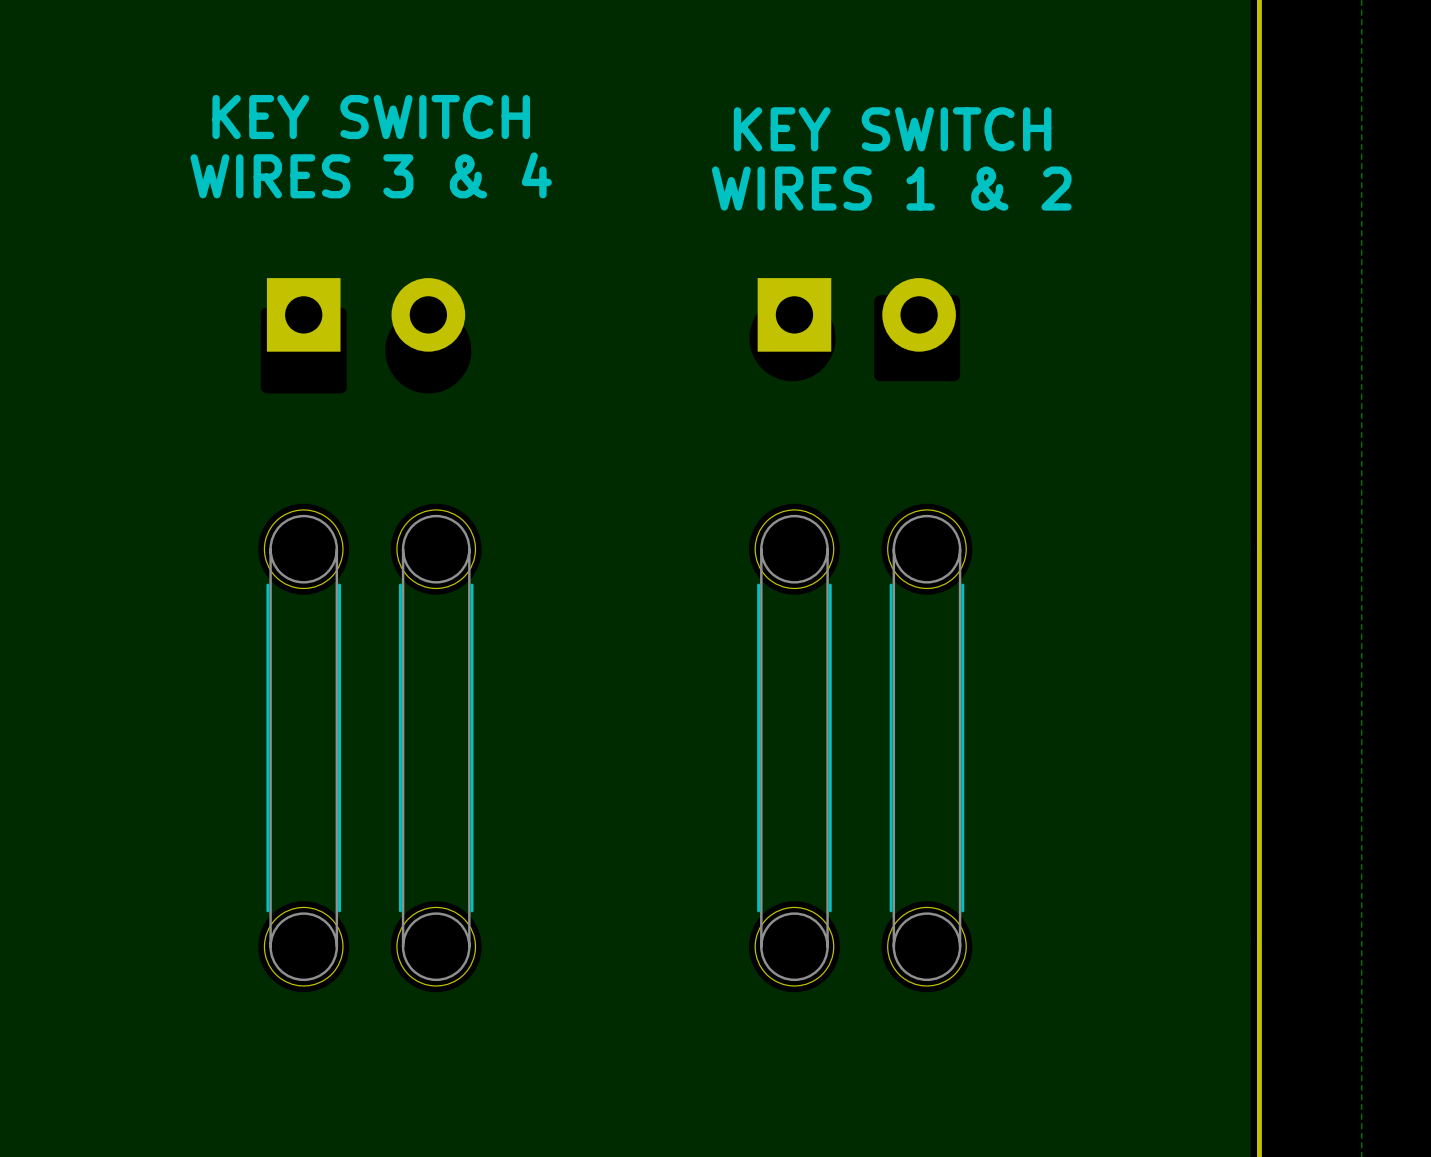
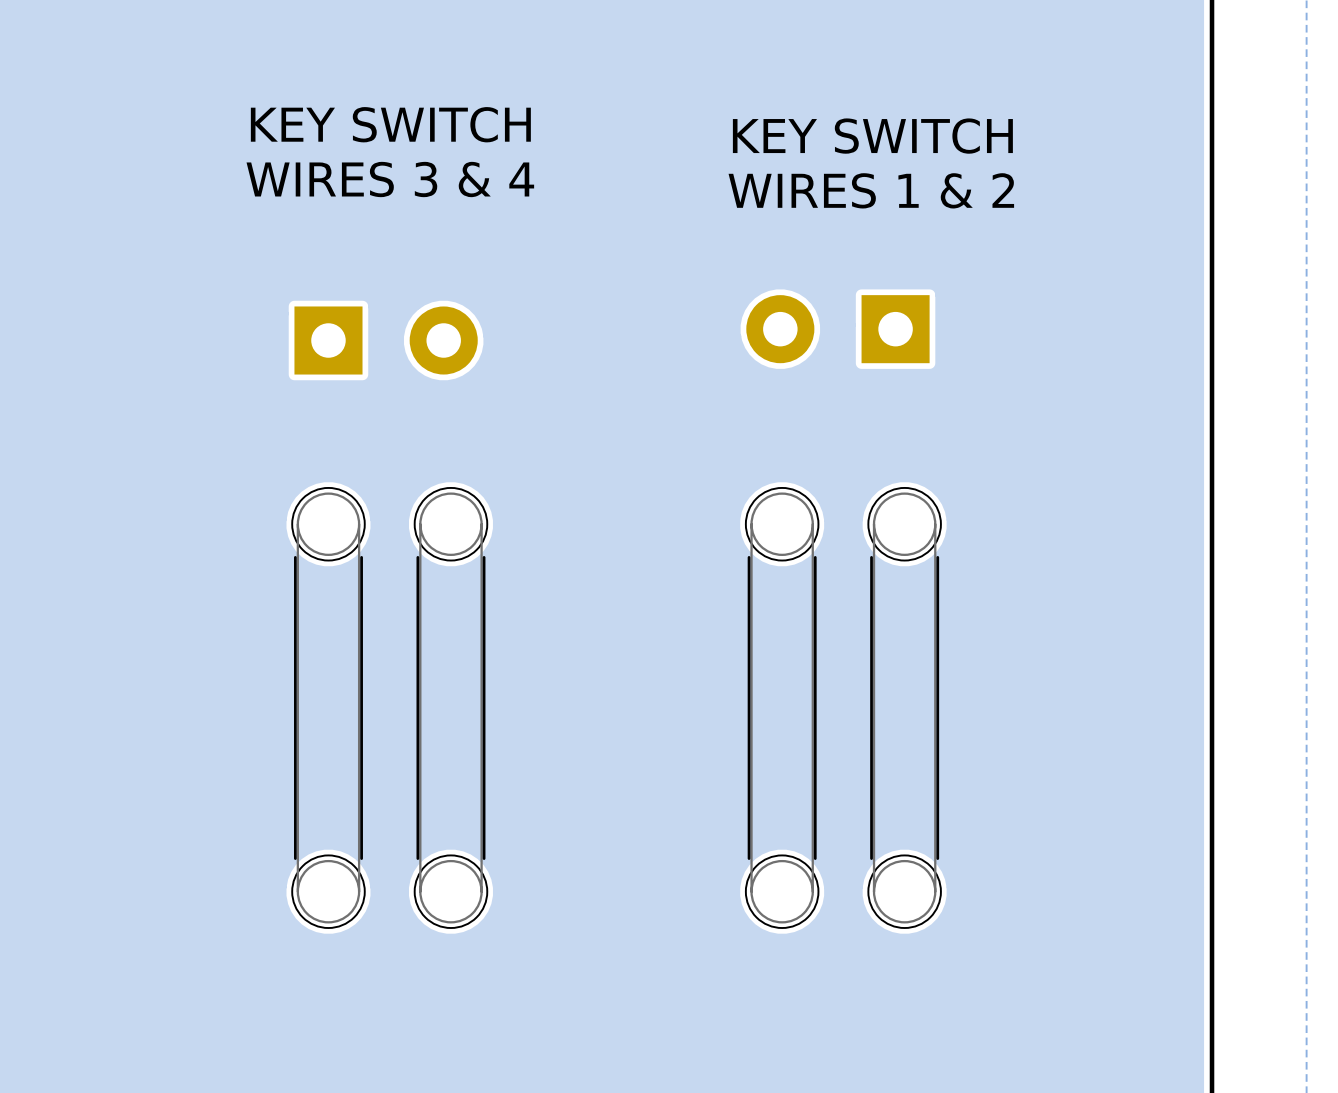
part position: (366, 314) -> (386, 340)
part rotation: 0° (856, 314) -> 180° (837, 329)

